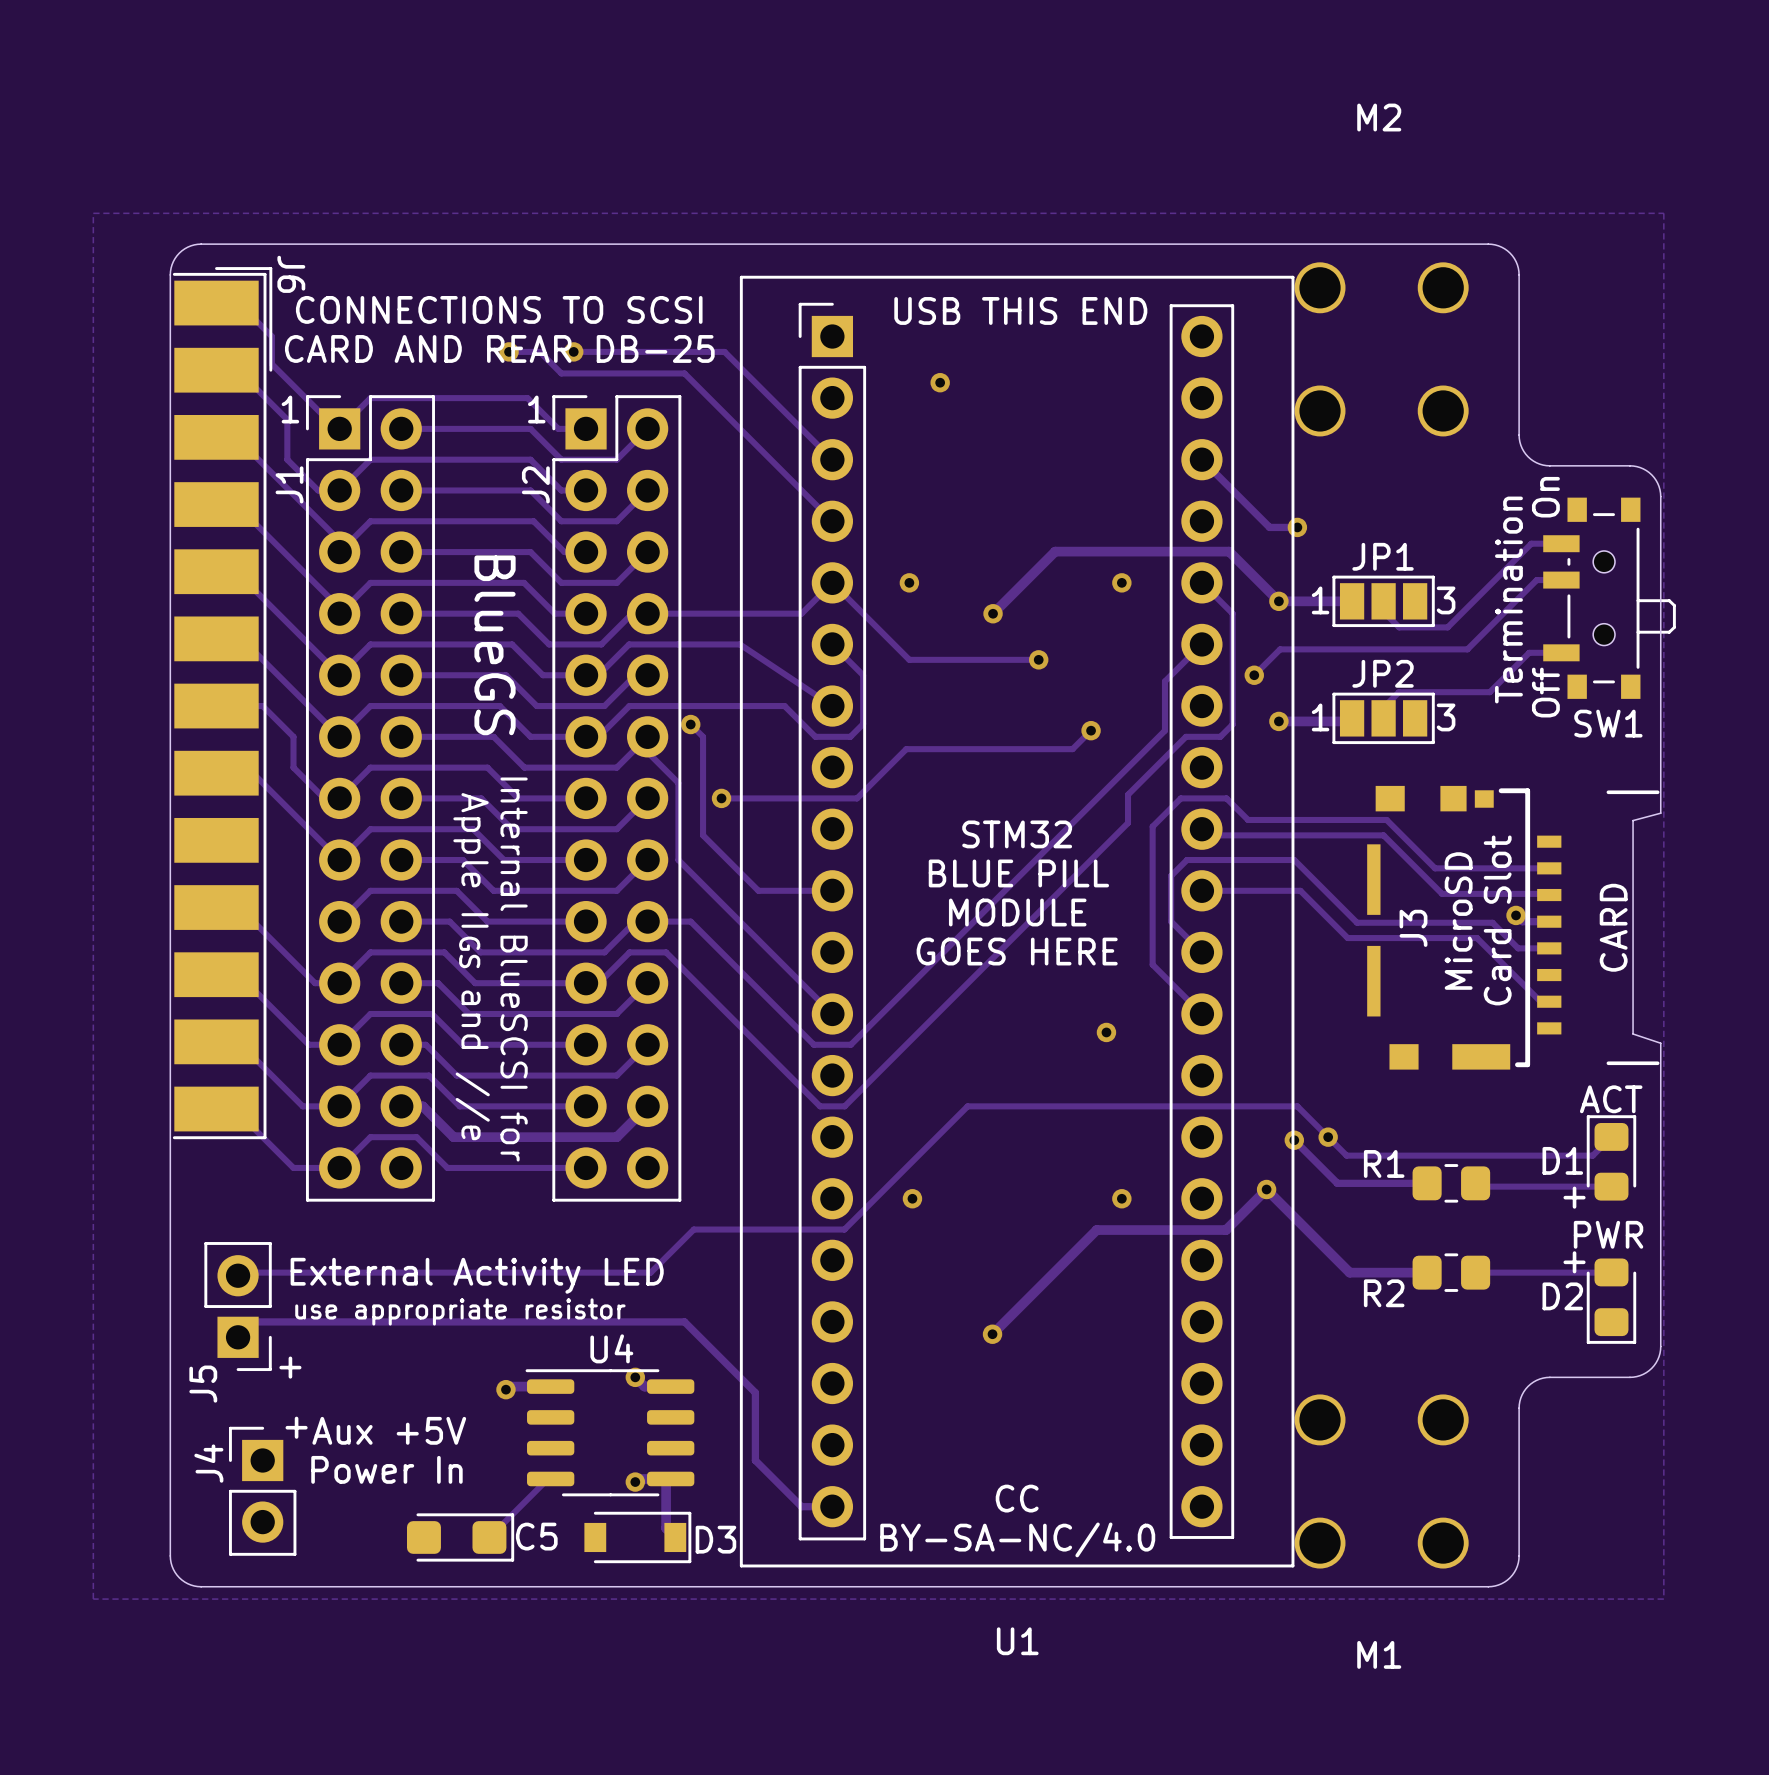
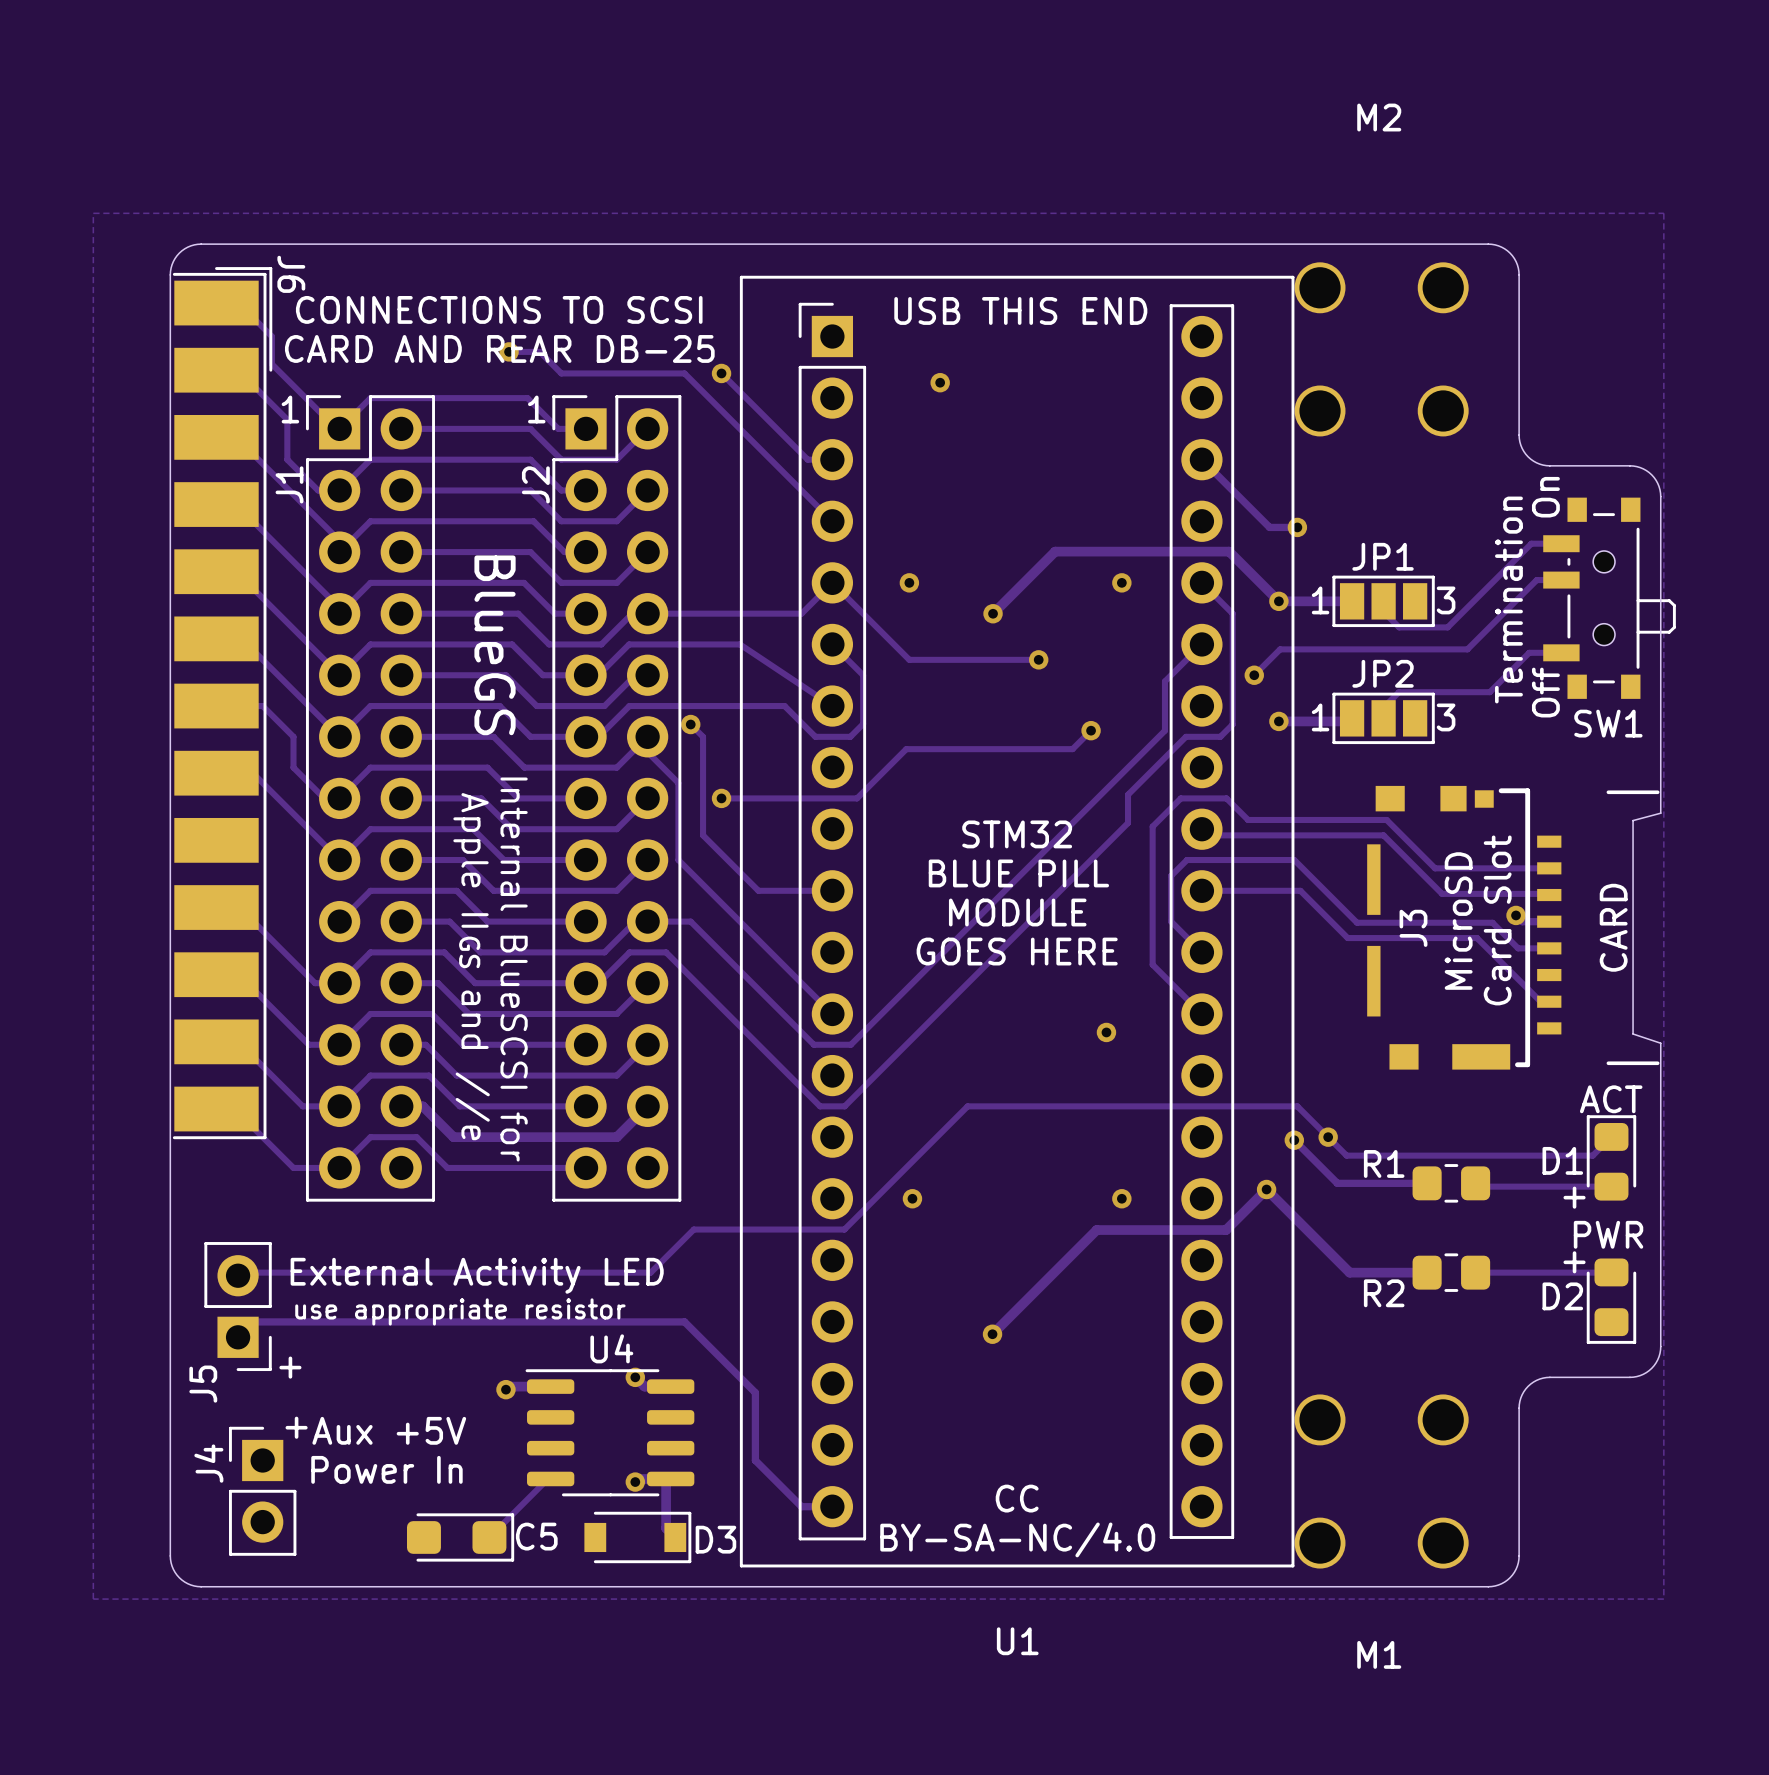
track: (573, 351) (724, 351) (832, 459) -> (721, 373) (807, 459) (832, 459)
via: (573, 351) -> none
via: none -> (721, 373)

